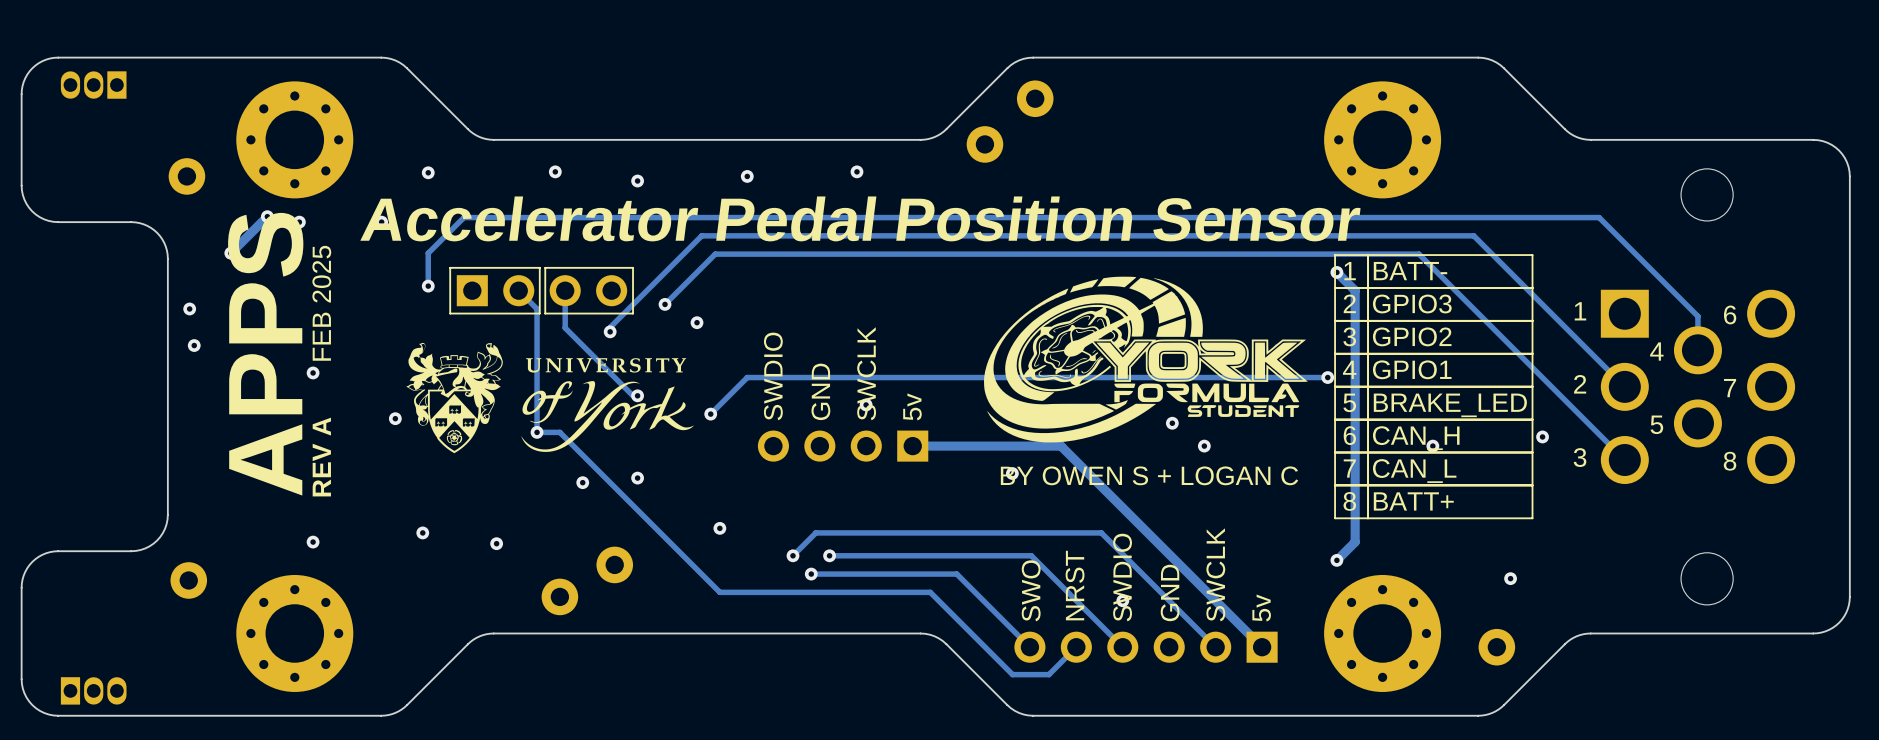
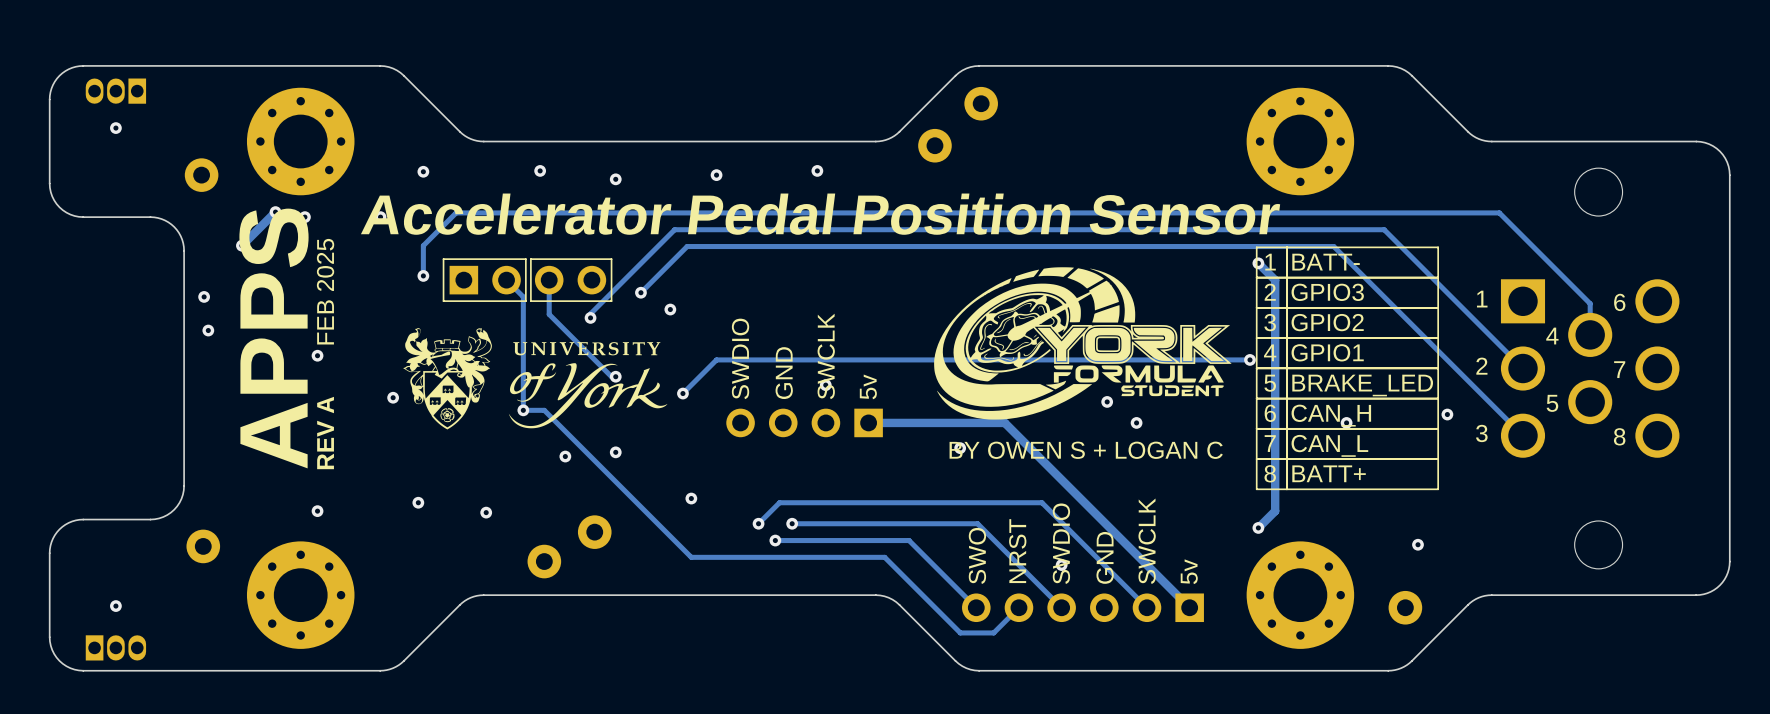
via: none -> (115, 128)
via: none -> (115, 606)

